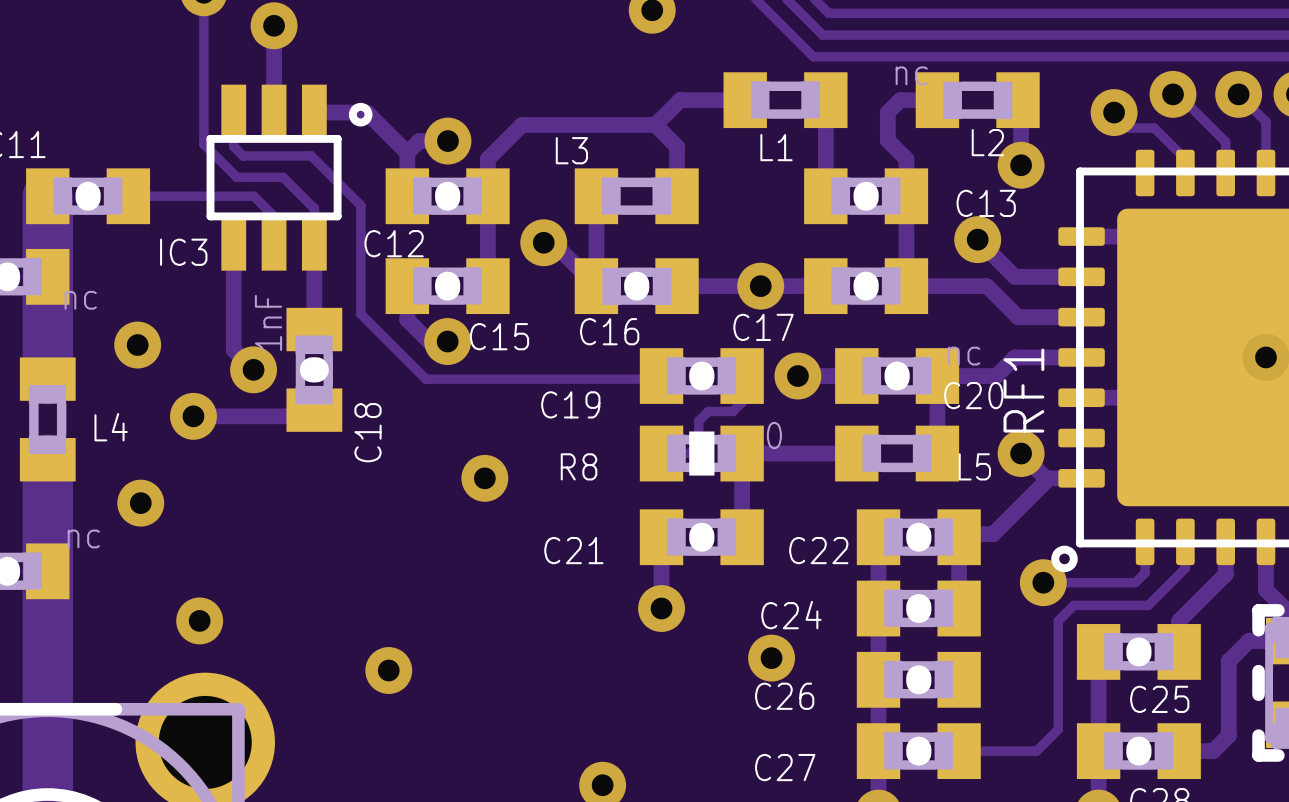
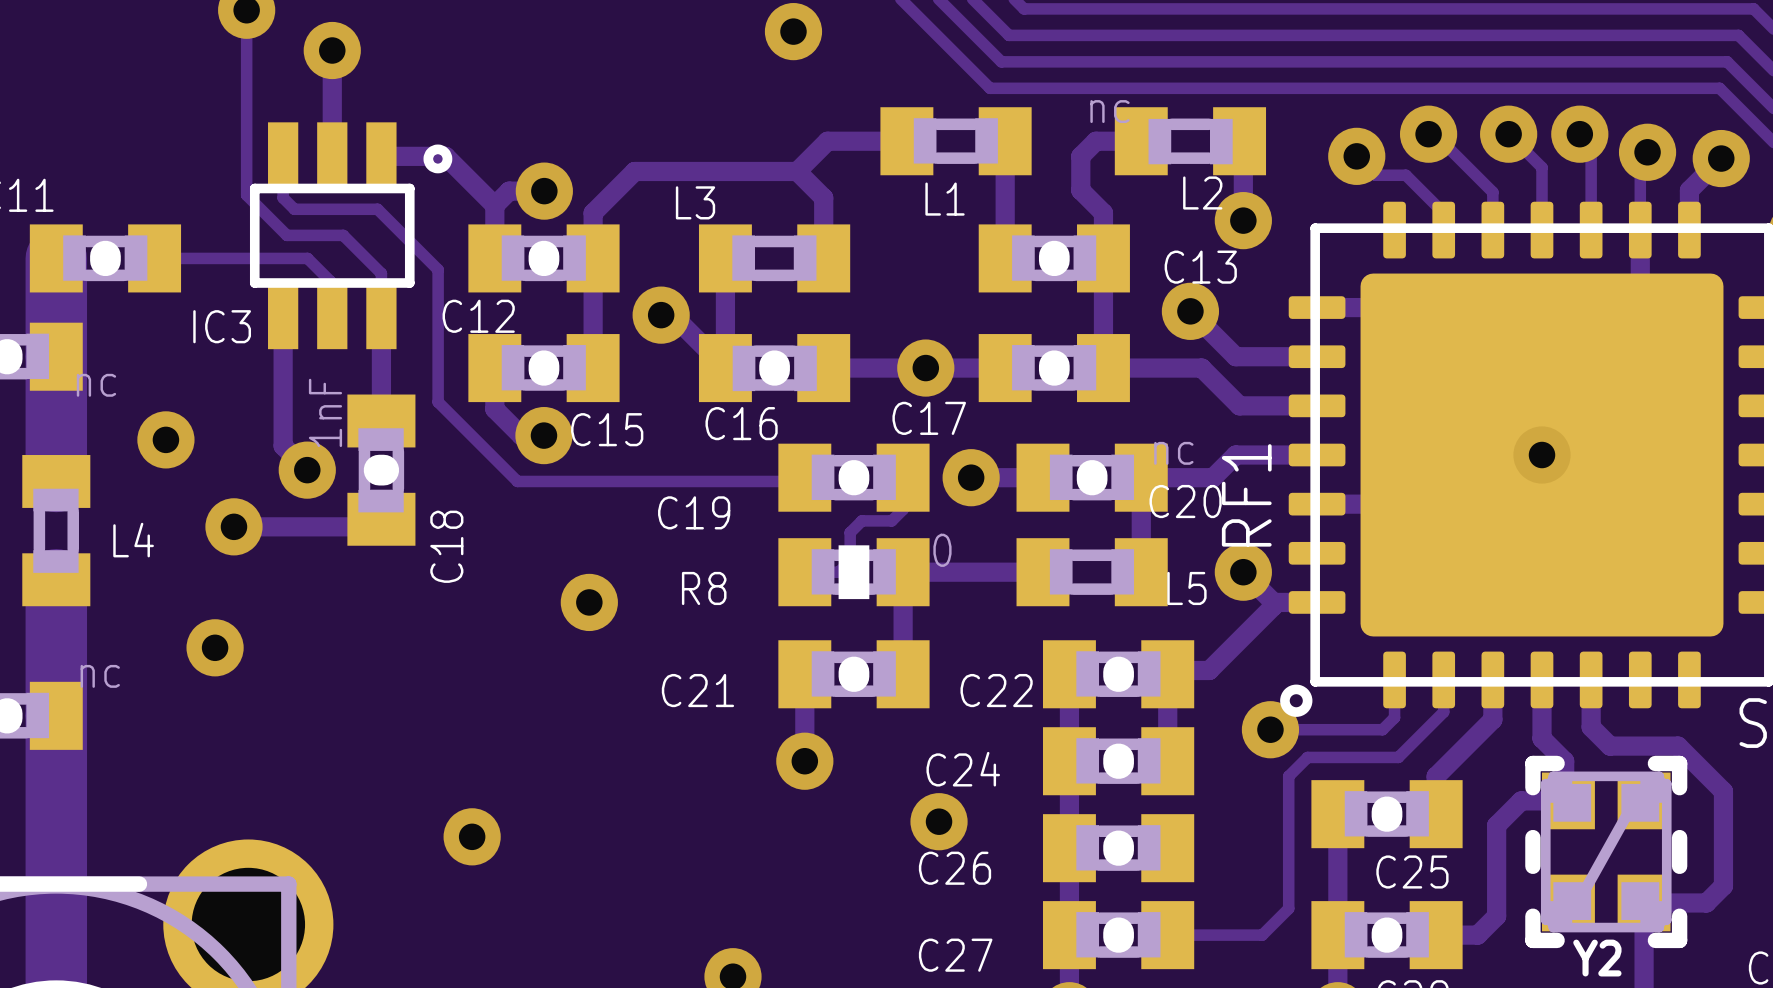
via position: (140, 503) -> (215, 647)
via: (199, 620) -> none

